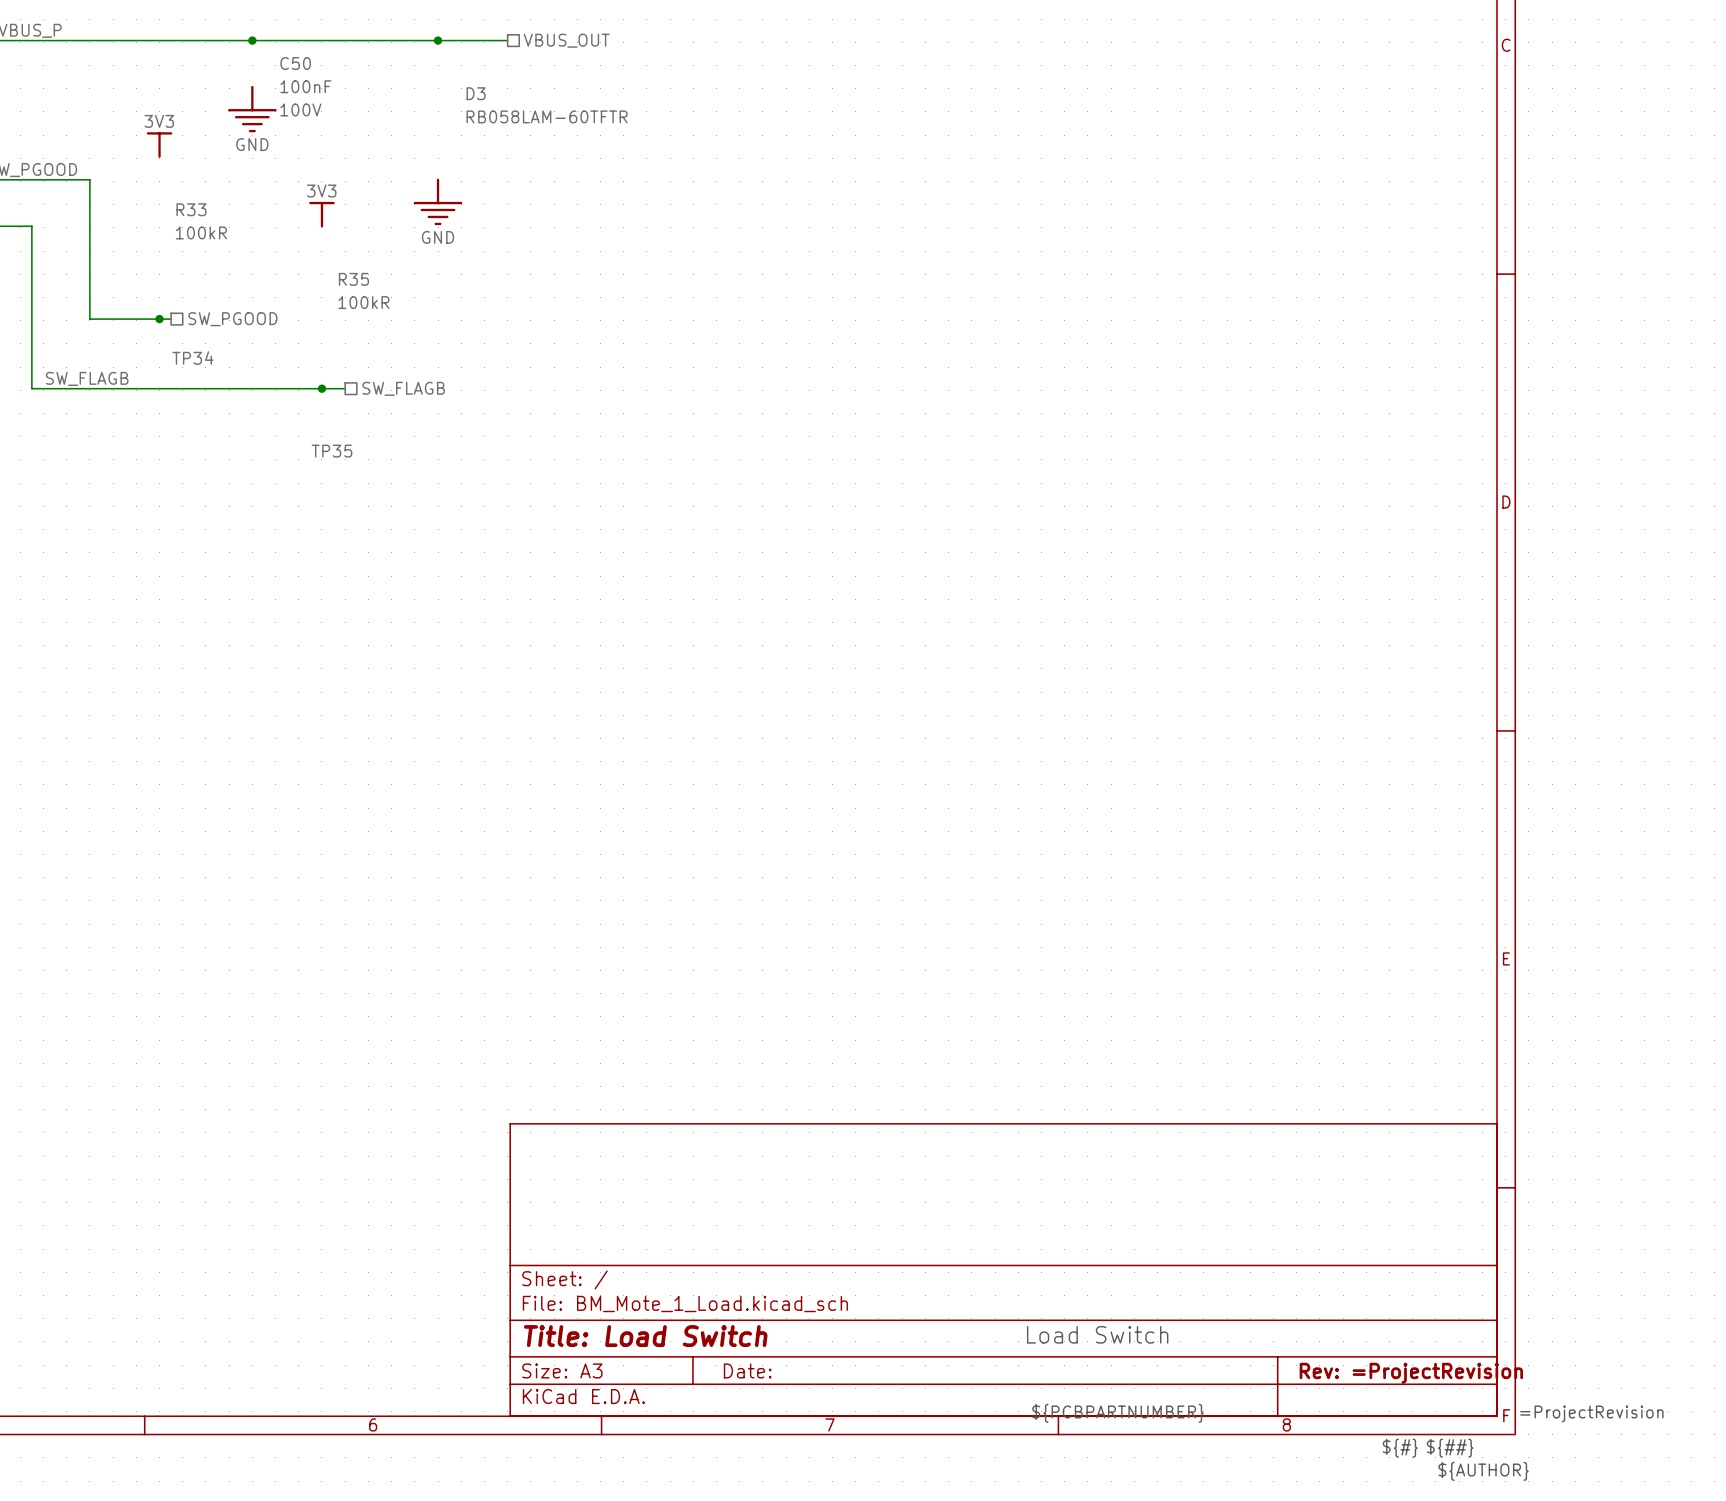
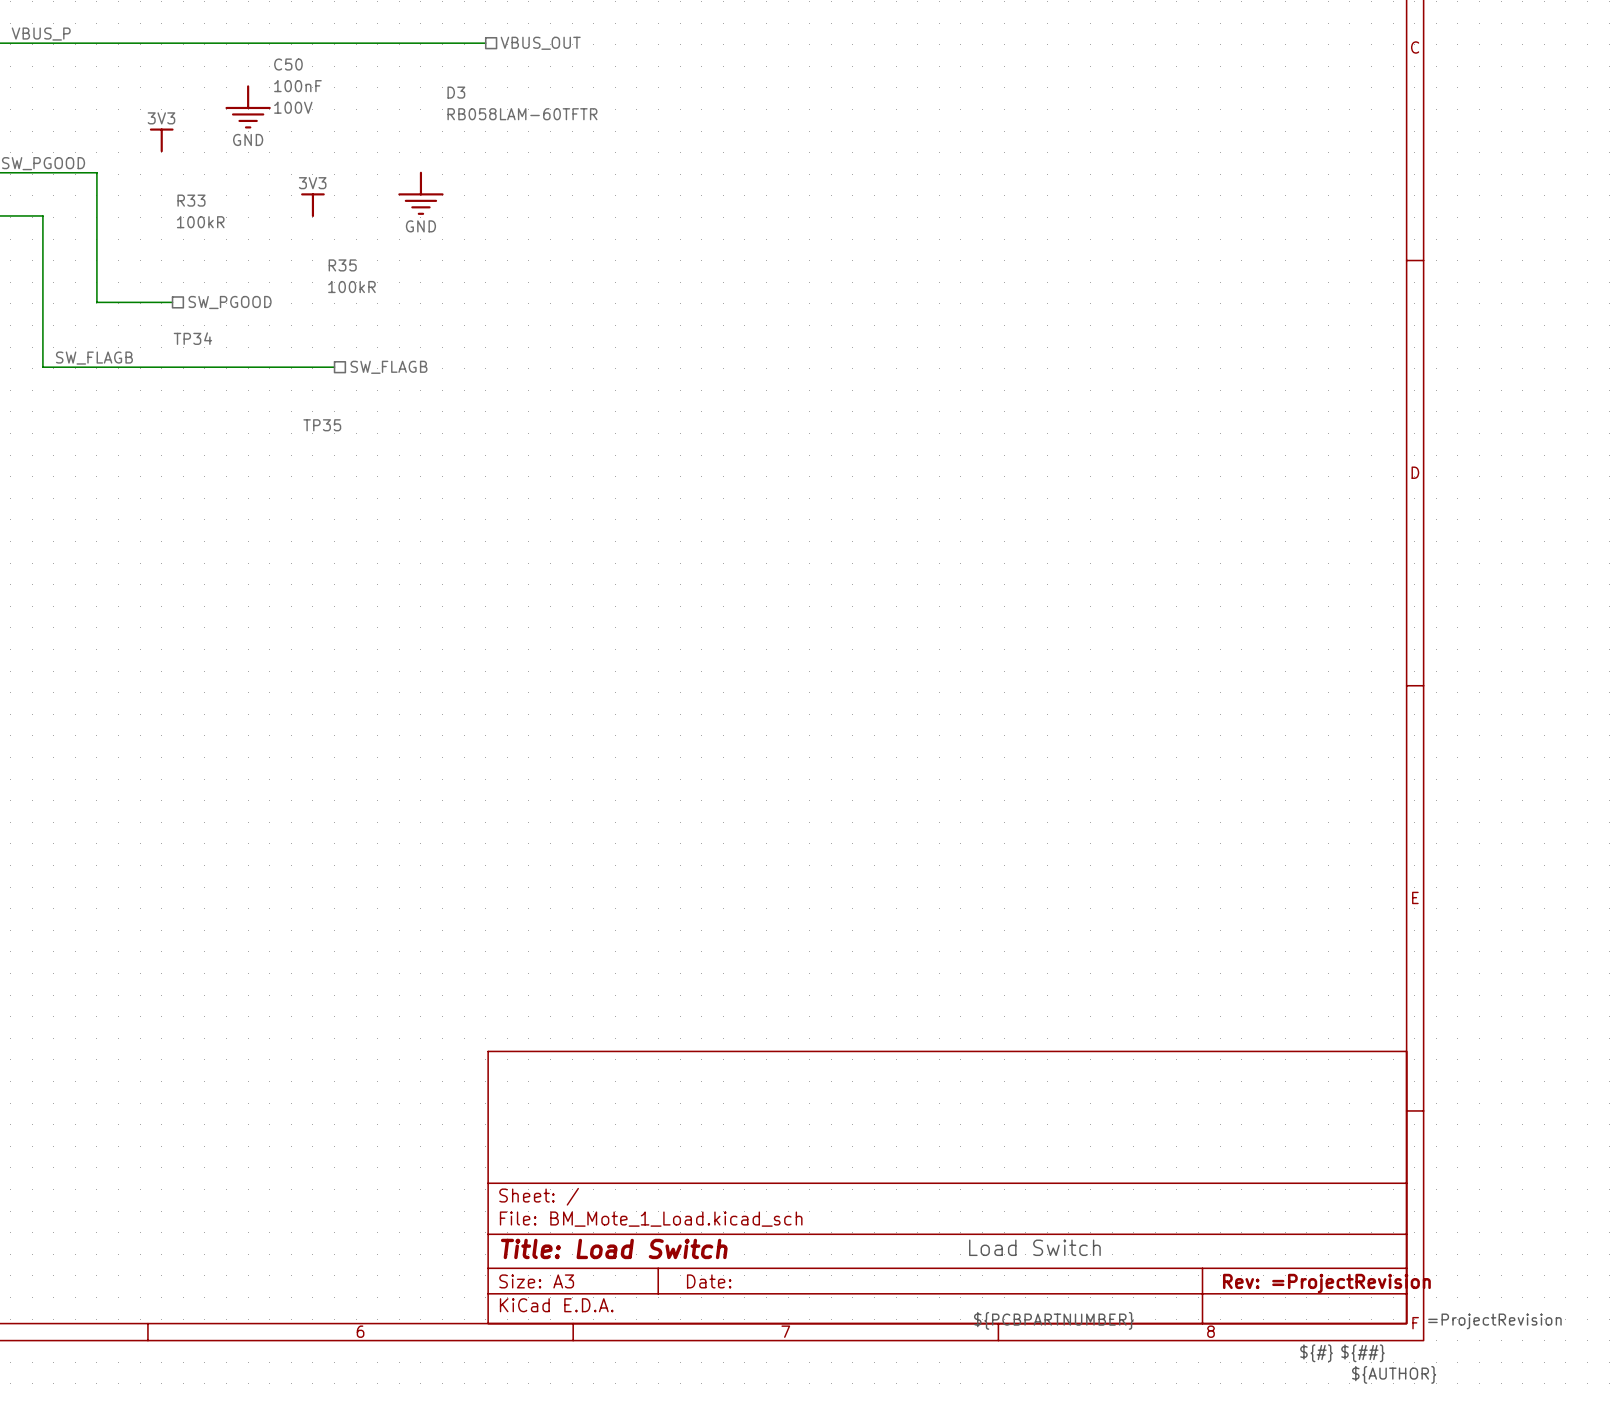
junction: (252, 40) -> none
junction: (438, 40) -> none
junction: (159, 319) -> none
junction: (321, 388) -> none

